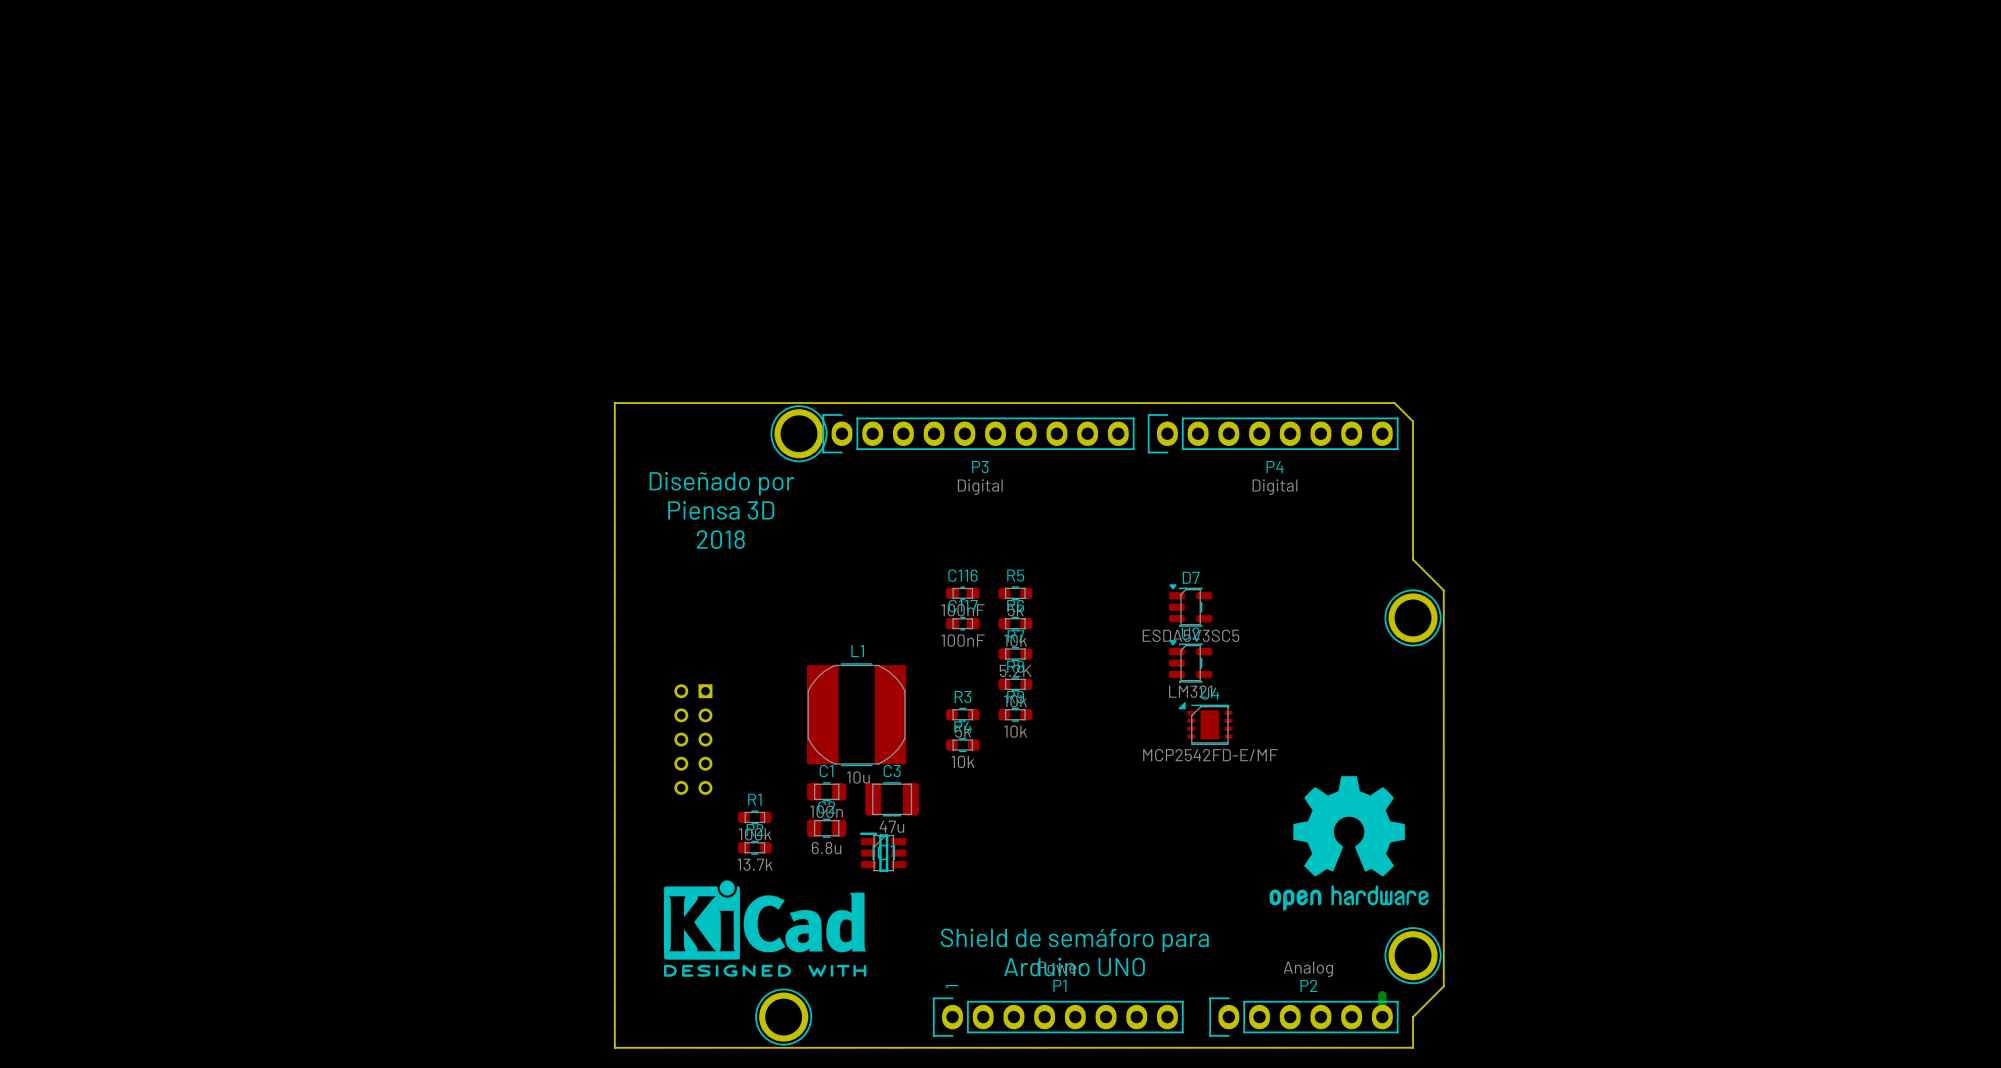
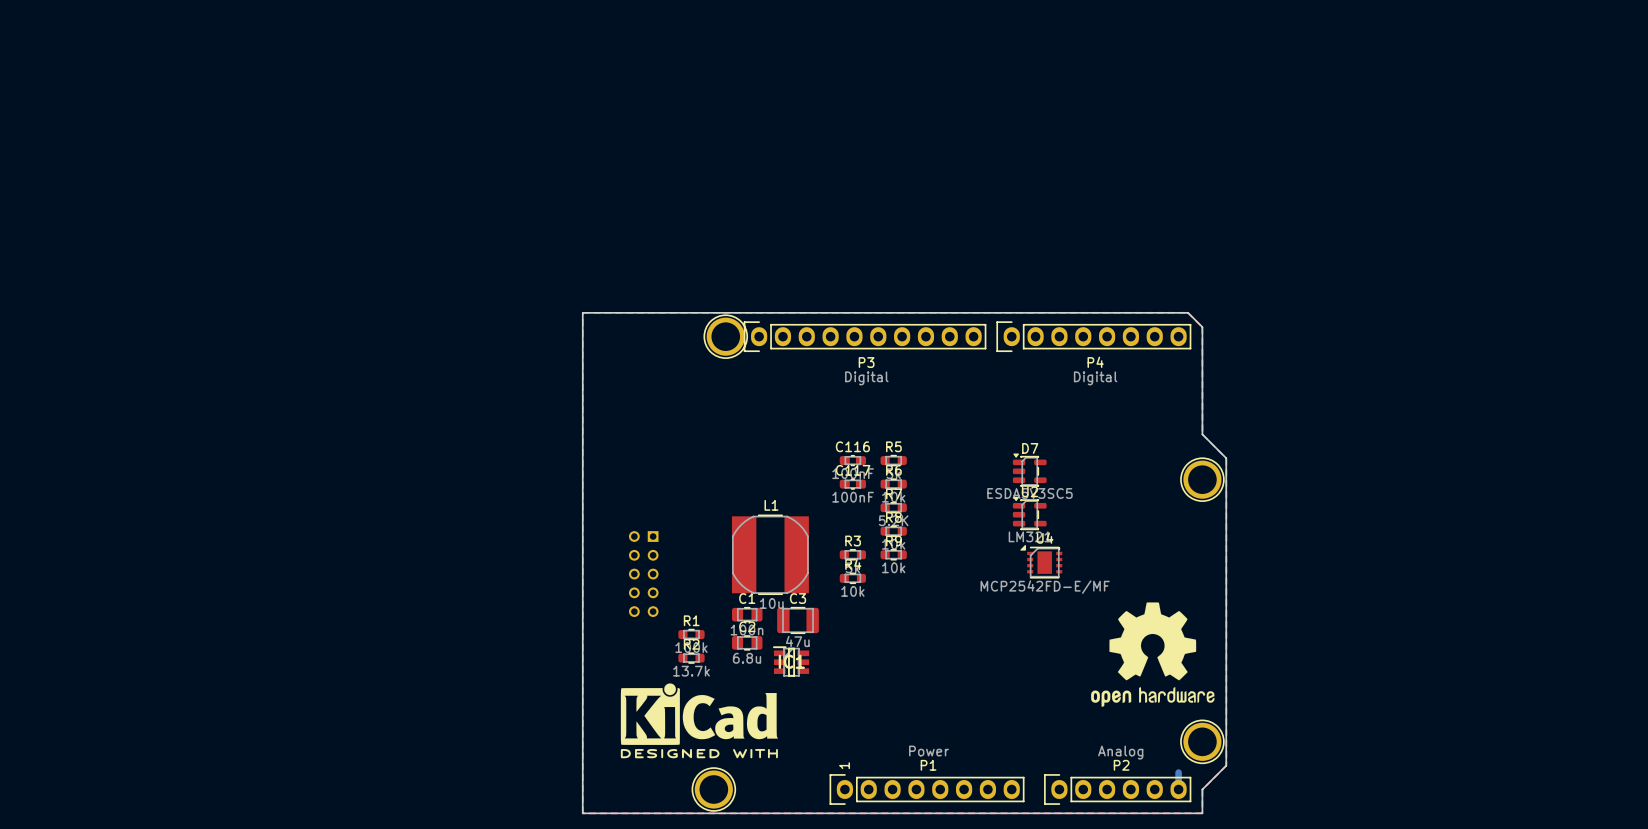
text: Diseñado por (721, 483) -> none
text: Piensa 3D (721, 510) -> none
text: 2018 (720, 539) -> none
text: Shield de semáforo para (1074, 940) -> none
text: Arduino UNO (1074, 967) -> none

